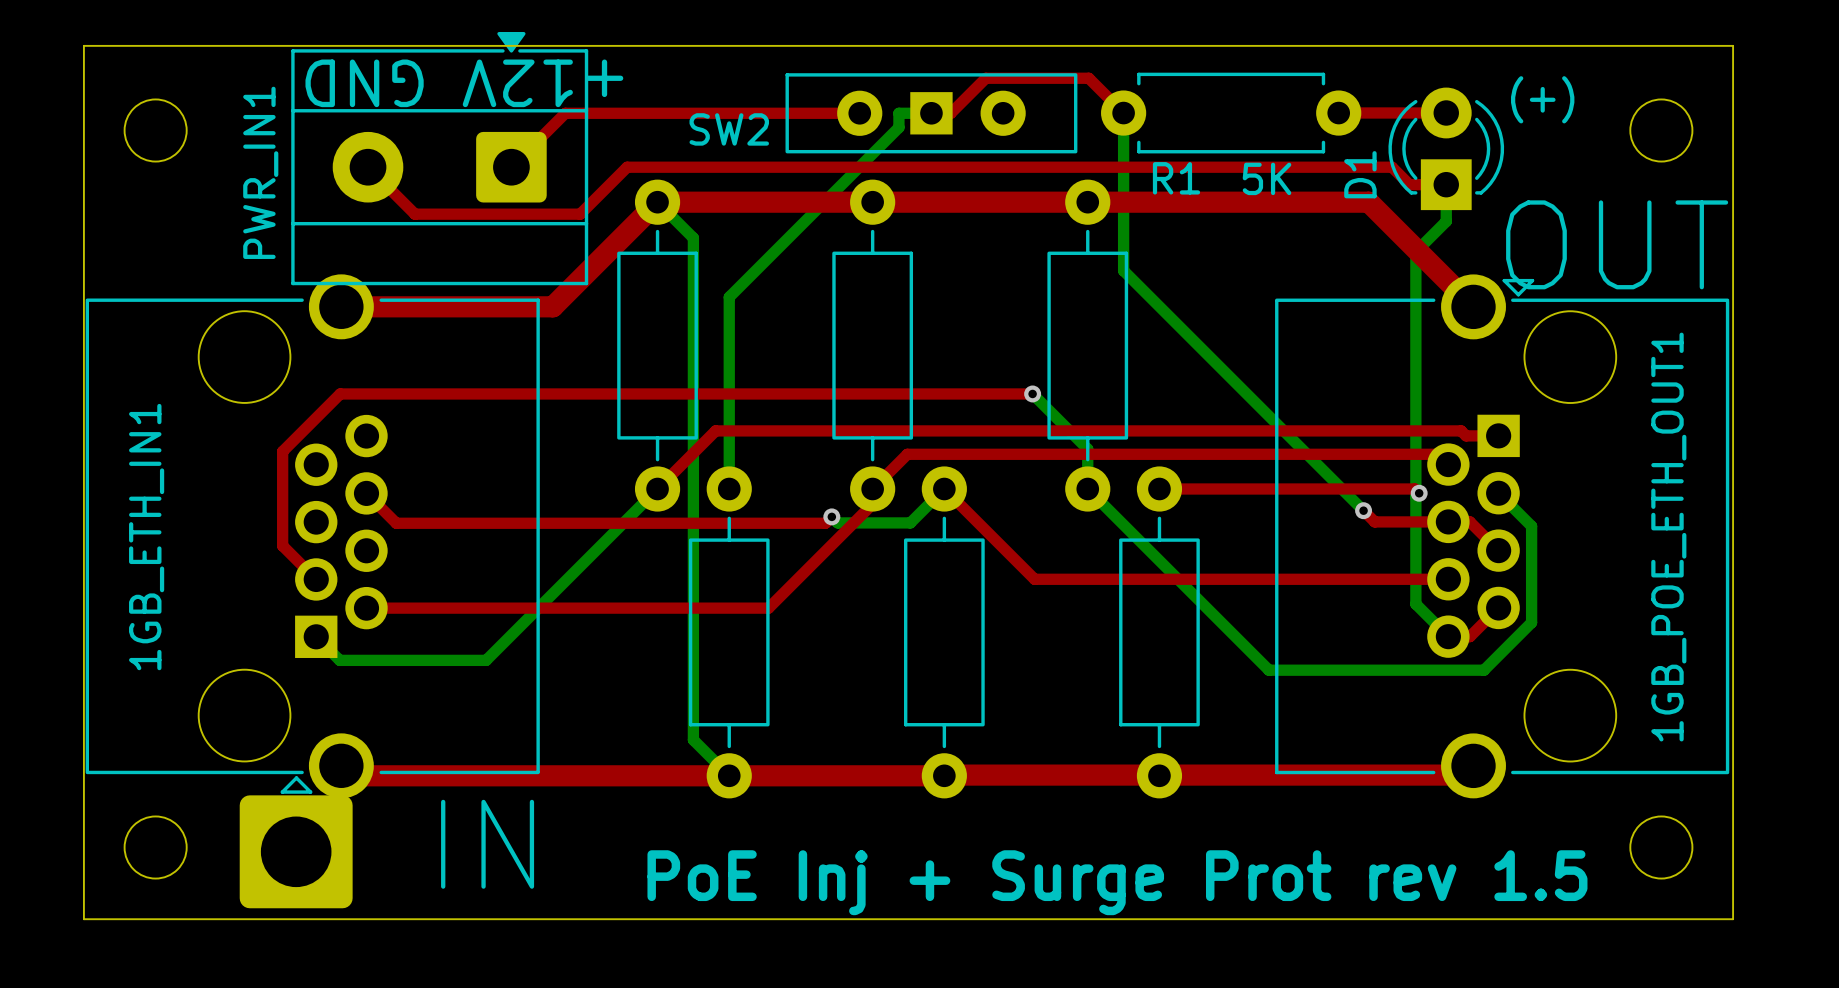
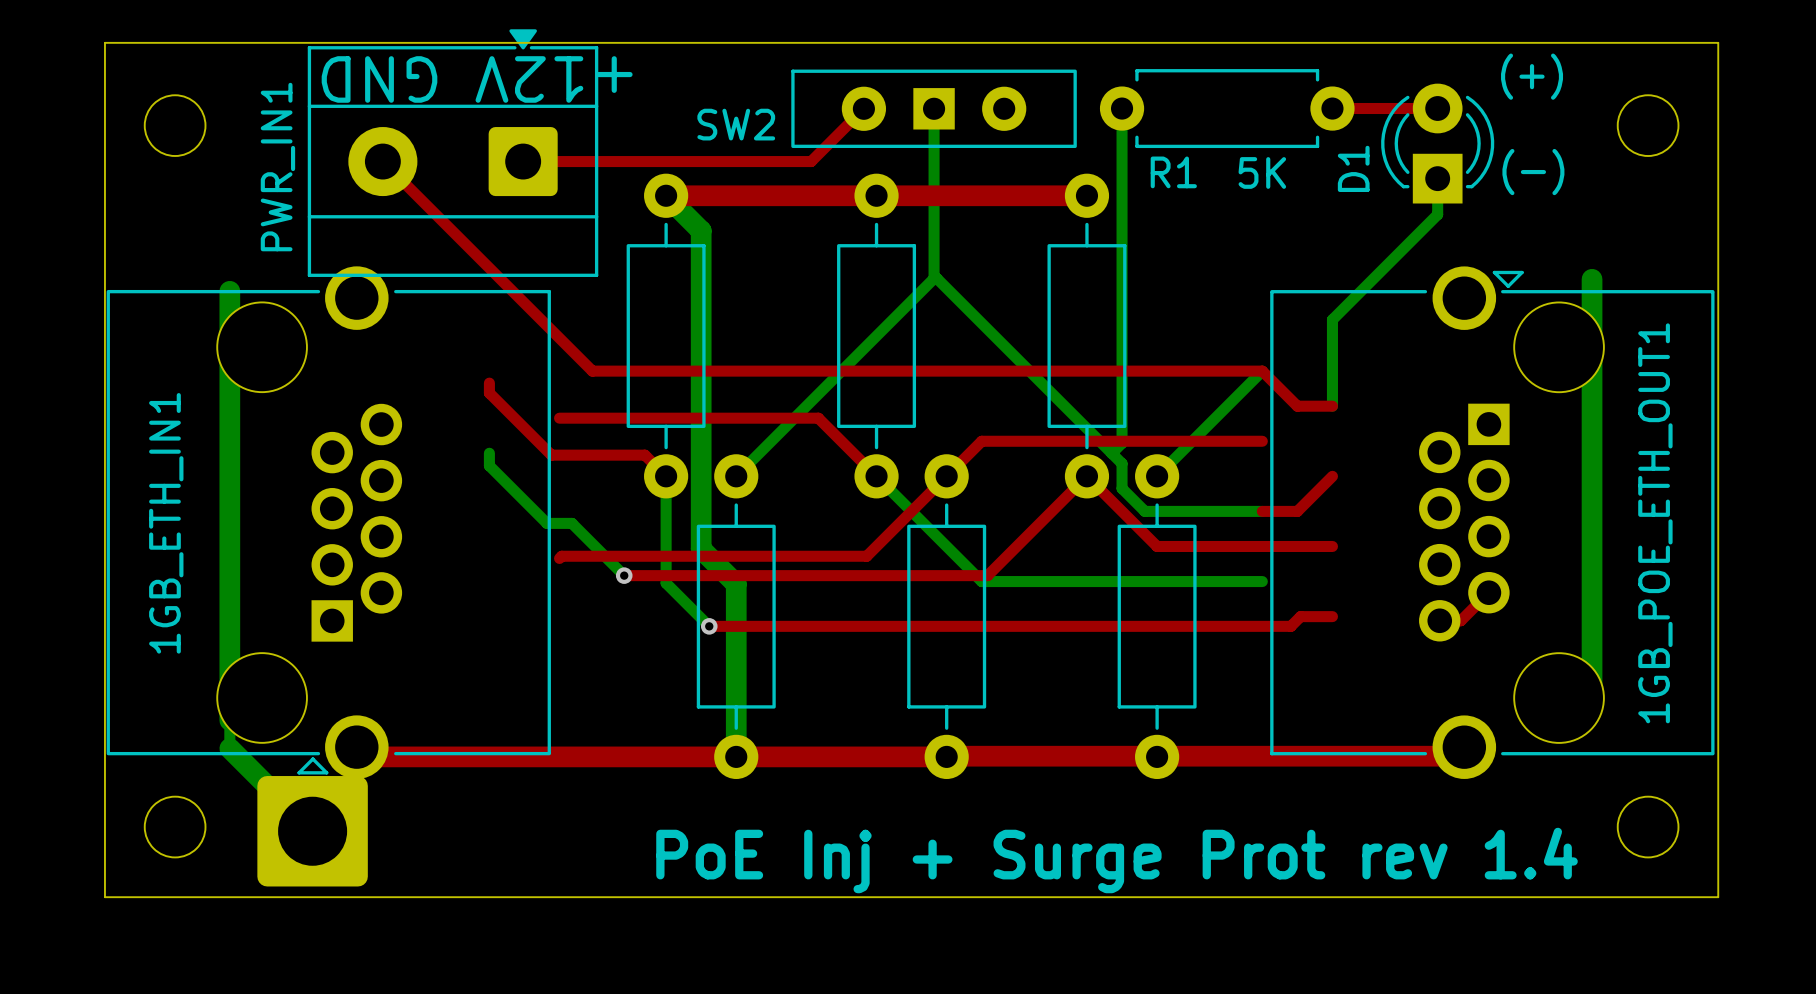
text position: (+) (1542, 99) -> (+) (1532, 76)
top track: (859, 113) (565, 113) (511, 167) -> (863, 108) (811, 161)
bottom track: (931, 113) (898, 113) (898, 127) (729, 297) (729, 489) -> (934, 278) (736, 476)
bottom track: none -> (934, 108) (934, 278)
top track: (1123, 113) (1088, 78) (985, 78) (950, 113) (931, 113) -> none
top track: (627, 167) (580, 214) (414, 214) -> (636, 161) (523, 161)
top track: (805, 167) (1392, 167) (1409, 184) (1446, 184) -> none
text: none -> (-) (1533, 172)
top track: (657, 202) (552, 306) (341, 306) -> none
bottom track width: thin (657, 202) (693, 238) (693, 563) -> thick (666, 195) (701, 230) (701, 549)
top track: (1087, 202) (1368, 202) (1473, 306) -> none
top track: none -> (428, 207) (592, 371) (1262, 371) (1297, 406) (1332, 406)
text: OUT (1617, 244) -> none
bottom track: (1415, 251) (1415, 489) (1419, 493) (1415, 496) (1415, 604) (1448, 636) -> (1407, 244) (1332, 319) (1332, 406)
bottom track: (1123, 270) (1363, 510) -> (1122, 262) (1122, 443) (1111, 453)
bottom track: none -> (934, 278) (936, 278) (1122, 463) (1122, 488) (1144, 511) (1262, 511)
bottom track: none -> (1592, 279) (1592, 708)
bottom track: none -> (229, 291) (229, 748) (312, 831)
bottom track: none -> (1262, 371) (1157, 476)
top track: (1032, 393) (340, 393) (282, 451) (282, 545) (316, 579) -> none
bottom track: (1032, 393) (1087, 449) (1087, 489) (1268, 670) (1484, 670) (1531, 622) (1531, 526) (1498, 493) -> none
via: (1032, 393) -> none
top track: (1498, 435) (1466, 435) (1461, 430) (715, 430) (657, 489) -> (489, 383) (489, 393) (551, 455) (644, 455) (666, 476)
top track: none -> (1262, 441) (981, 441) (866, 556) (561, 556) (559, 558)
top track: (1438, 454) (907, 454) (872, 489) -> (559, 418) (818, 418) (876, 476)
bottom track: none -> (489, 453) (489, 465) (546, 523) (571, 523) (624, 575)
bottom track: (657, 489) (486, 660) (339, 660) (316, 636) -> (666, 476) (666, 583) (709, 626)
bottom track: none -> (876, 476) (981, 581) (1262, 581)
top track: (944, 489) (1034, 579) (1448, 579) -> none
bottom track: (944, 489) (910, 522) (837, 522) (831, 516) -> none
top track: (1159, 489) (1414, 489) (1419, 493) -> none
top track: none -> (1332, 476) (1297, 511) (1262, 511)
top track: (366, 493) (396, 523) (825, 523) (831, 516) -> none
via: (1419, 493) -> none
top track: (872, 504) (768, 608) (366, 608) -> none
top track: (1363, 510) (1374, 521) (1469, 521) (1498, 550) -> none
via: (1363, 510) -> none
via: (831, 516) -> none
top track: none -> (1332, 546) (1157, 546) (1086, 476) (987, 575) (624, 575)
bottom track: (693, 563) (693, 739) (729, 775) -> (701, 549) (736, 584) (736, 756)
via: none -> (624, 575)
top track: none -> (1332, 616) (1300, 616) (1290, 626) (709, 626)
via: none -> (709, 626)
text: IN (487, 844) -> none
text: PoE Inj + Surge Prot rev 1.5 (1117, 882) -> PoE Inj + Surge Prot rev 1.4 (1117, 860)

